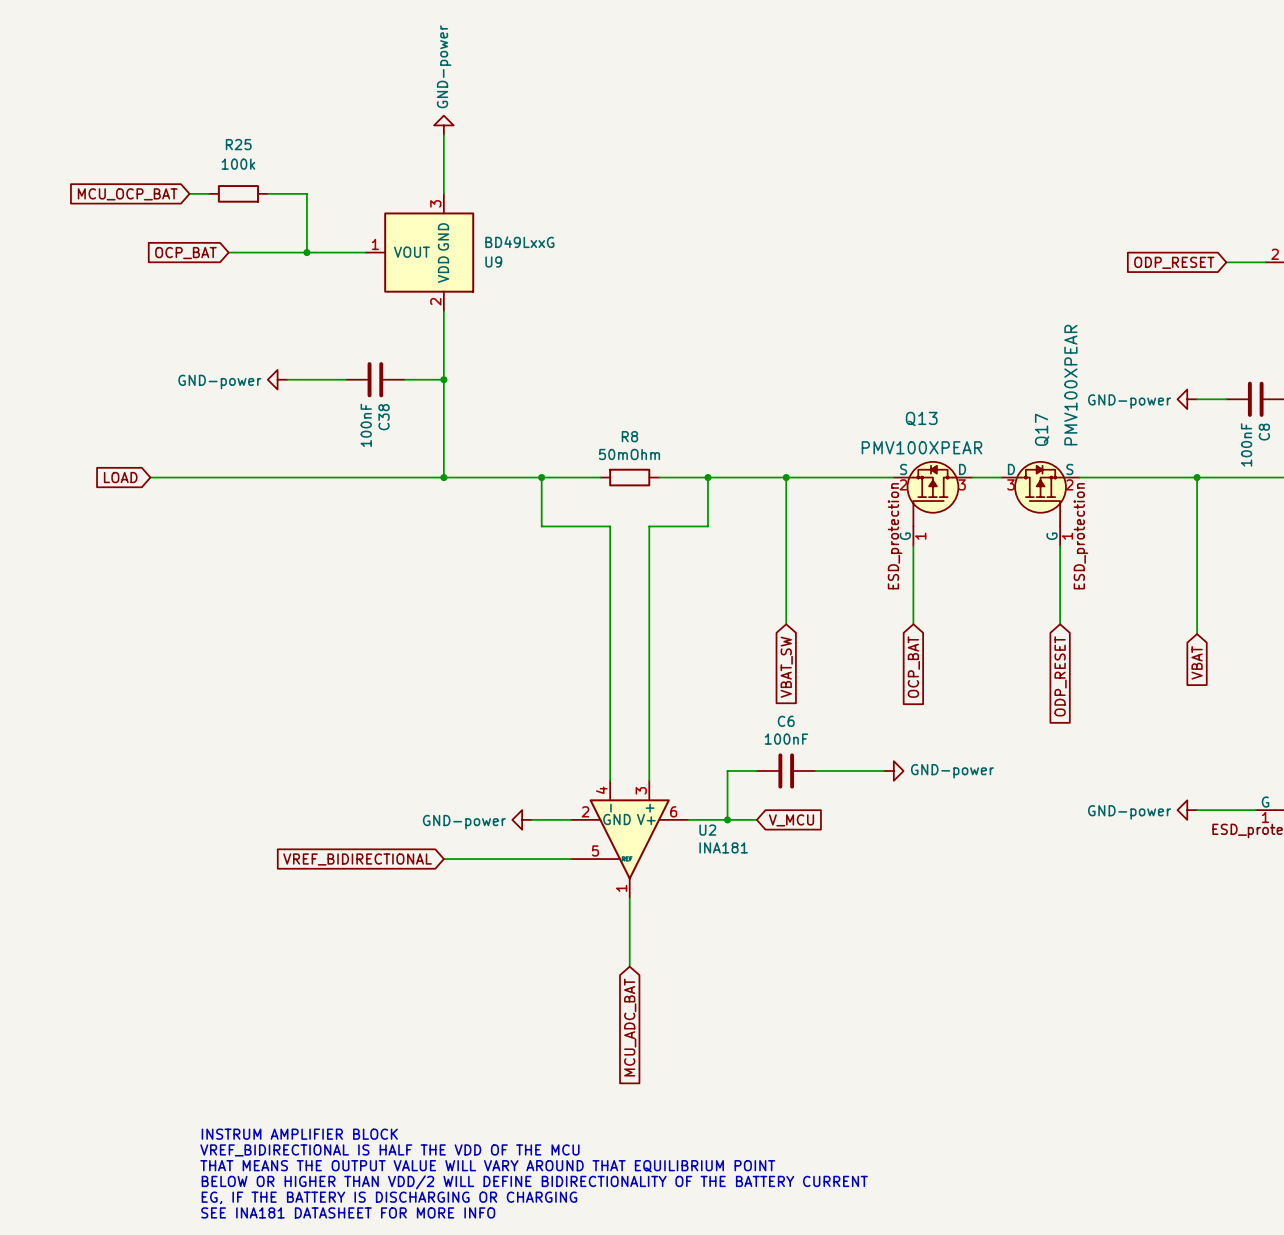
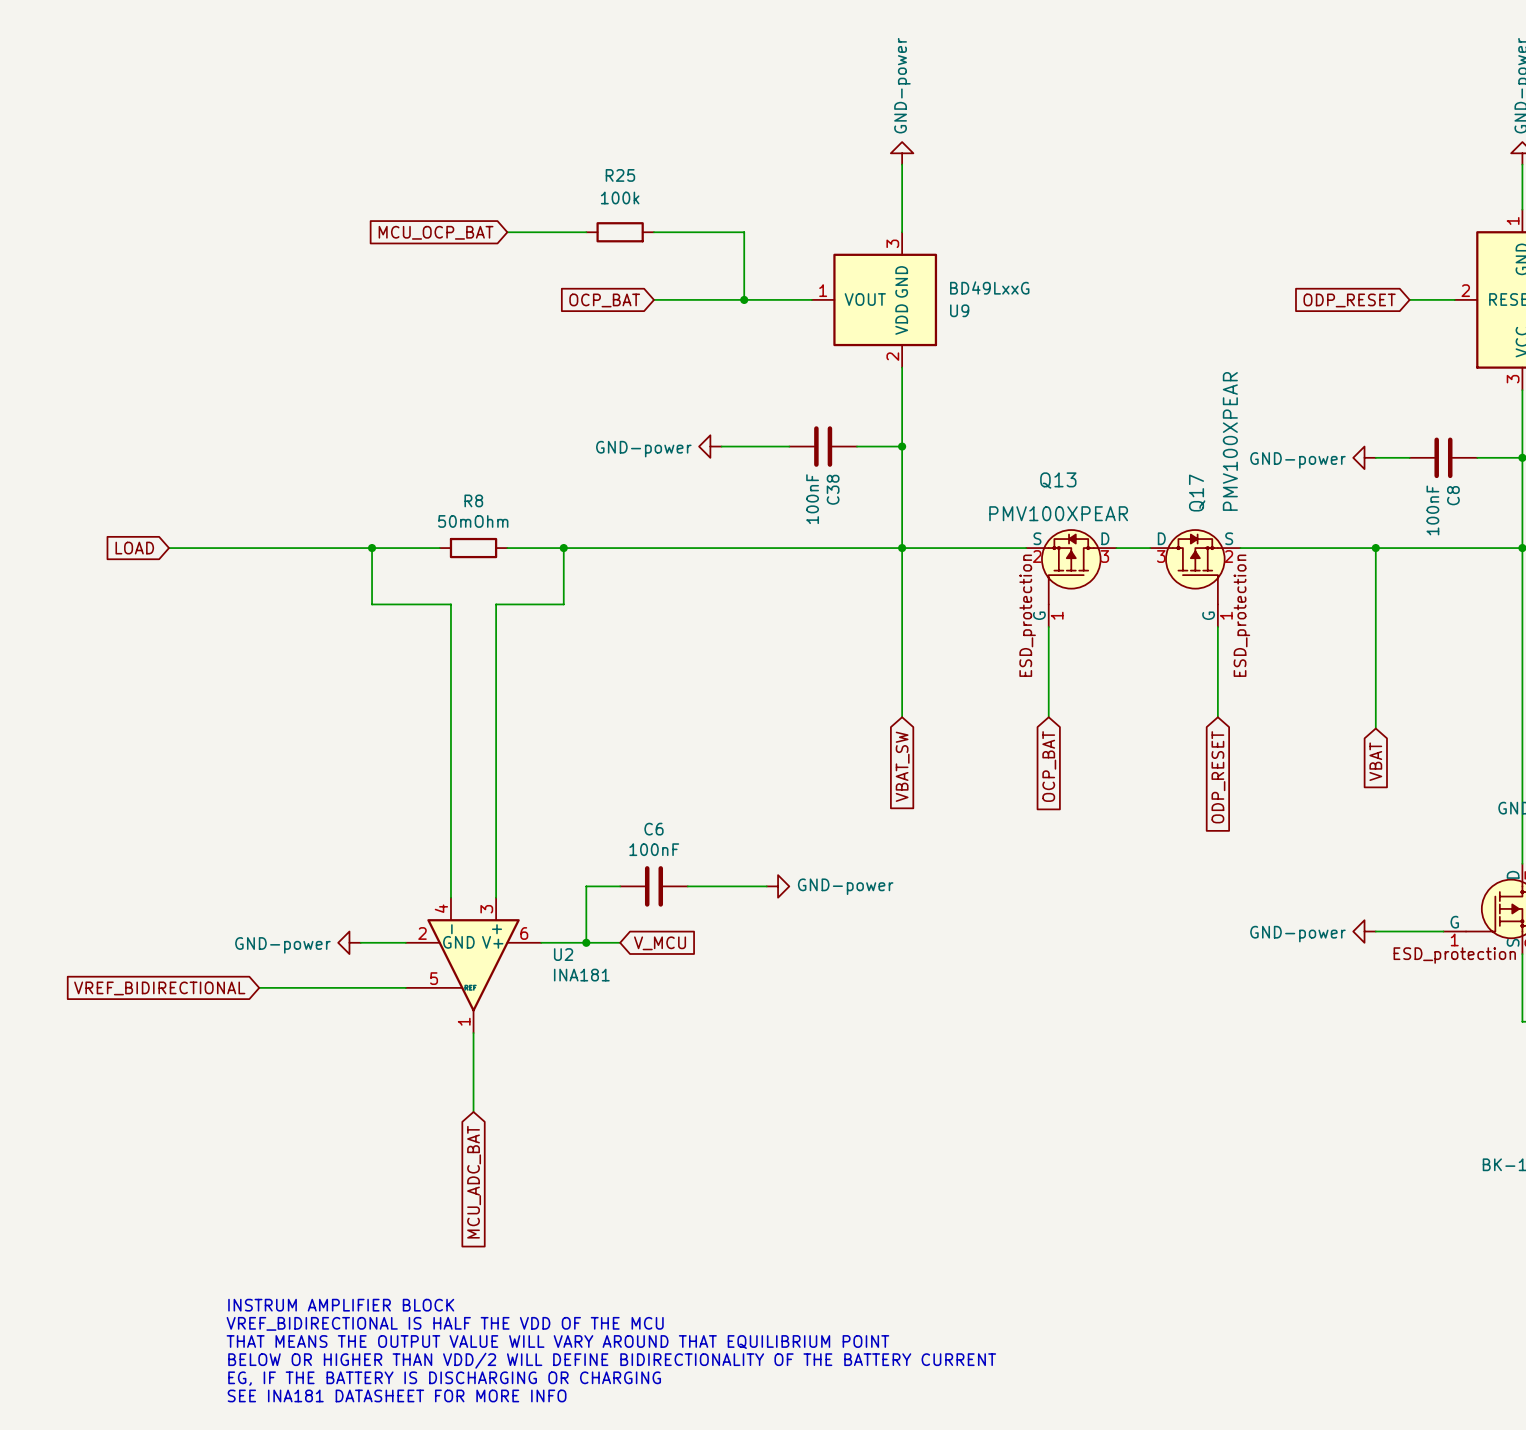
power symbol: GND-power (443, 125) -> none
wire: (443, 135) (443, 193) -> none
power symbol: none -> GND-power (902, 153)
wire: none -> (902, 164) (902, 232)
wire: (189, 193) (209, 193) -> none
R25 position: (238, 193) -> (620, 232)
wire: (267, 193) (306, 193) (306, 252) -> none
global label: MCU_OCP_BAT (127, 194) -> none
wire: none -> (507, 232) (586, 232)
wire: none -> (653, 232) (744, 232) (744, 299)
global label: none -> MCU_OCP_BAT (436, 232)
wire: (228, 252) (365, 252) -> none
junction: (306, 252) -> none
U9 position: (419, 252) -> (874, 299)
global label: OCP_BAT (185, 253) -> none
global label: none -> OCP_BAT (604, 300)
wire: none -> (653, 299) (811, 299)
junction: none -> (744, 299)
wire: (443, 311) (443, 477) (385, 477) -> none
wire: none -> (902, 367) (902, 548)
power symbol: GND-power (277, 379) -> none
wire: (287, 379) (346, 379) -> none
C38 position: (375, 379) -> (823, 446)
wire: (404, 379) (443, 379) -> none
junction: (443, 379) -> none
power symbol: none -> GND-power (710, 446)
wire: none -> (721, 446) (789, 446)
wire: none -> (857, 446) (902, 446)
junction: none -> (902, 446)
wire: none -> (372, 548) (372, 604) (450, 604) (450, 897)
junction: none -> (372, 548)
junction: (443, 477) -> none
wire: none -> (563, 548) (563, 604) (496, 604) (496, 897)
junction: none -> (563, 548)
wire: (541, 477) (541, 526) (610, 526) (610, 780) -> none
junction: (541, 477) -> none
wire: none -> (687, 548) (755, 548)
R8 position: (629, 477) -> (473, 548)
wire: (707, 477) (707, 526) (649, 526) (649, 780) -> none
junction: (707, 477) -> none
wire: none -> (620, 886) (586, 886) (586, 942)
power symbol: none -> GND-power (778, 886)
wire: (756, 770) (727, 770) (727, 819) -> none
C6 position: (786, 770) -> (653, 886)
wire: (815, 770) (884, 770) -> none
power symbol: GND-power (893, 770) -> none
power symbol: none -> GND-power (349, 942)
wire: none -> (360, 942) (405, 942)
wire: none -> (541, 942) (608, 942)
junction: none -> (586, 942)
power symbol: GND-power (522, 819) -> none
wire: (541, 819) (571, 819) -> none
wire: (688, 819) (756, 819) -> (687, 886) (766, 886)
junction: (727, 819) -> none
global label: none -> V_MCU (660, 943)
global label: V_MCU (791, 820) -> none
U2 position: (629, 839) -> (473, 965)
global label: none -> VREF_BIDIRECTIONAL (159, 988)
wire: none -> (259, 987) (405, 987)
global label: VREF_BIDIRECTIONAL (357, 859) -> none
wire: (443, 859) (571, 859) -> none
wire: none -> (473, 1033) (473, 1111)
wire: (629, 898) (629, 966) -> none
global label: none -> MCU_ADC_BAT (474, 1182)
global label: MCU_ADC_BAT (630, 1027) -> none

